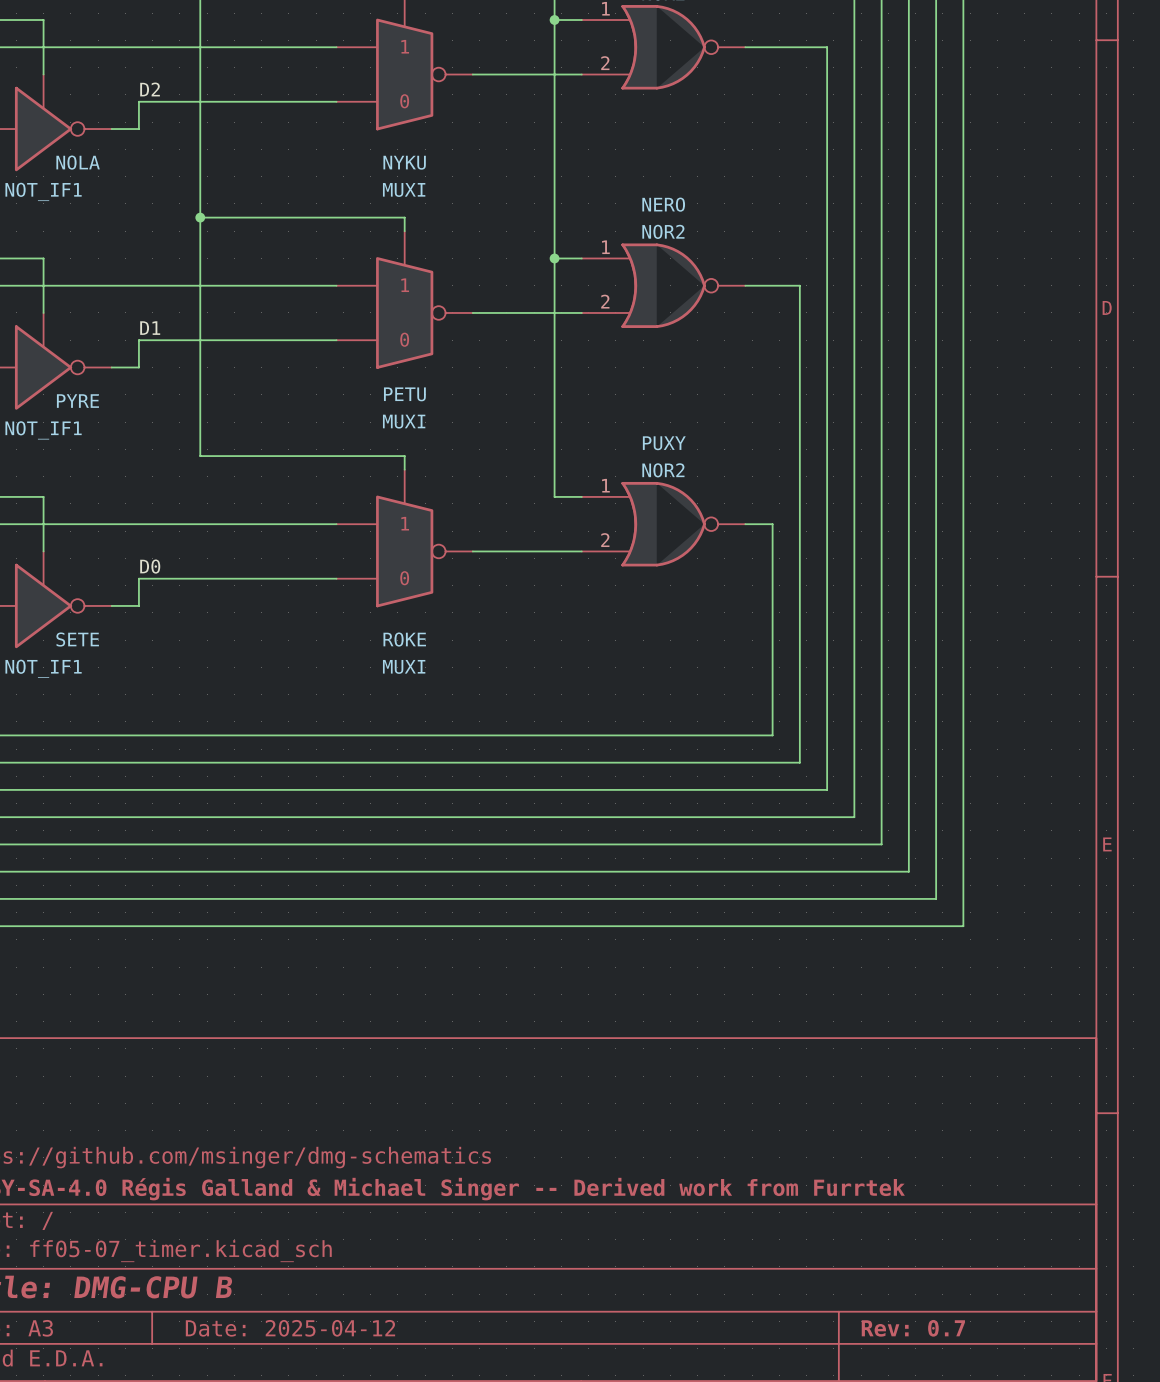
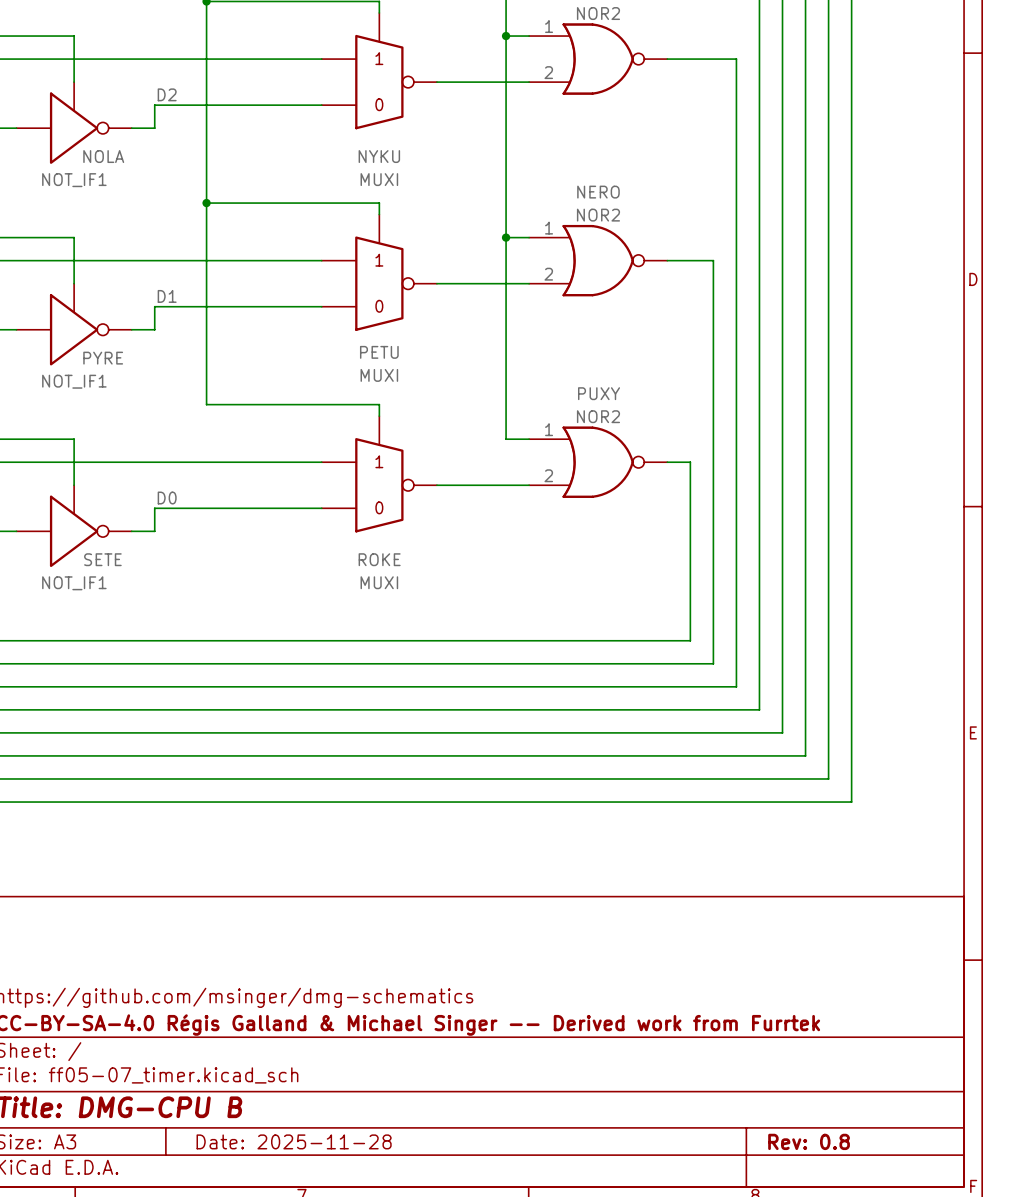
title block: Date: 2025-04-12 (290, 1328) -> Date: 2025-11-28 (294, 1141)
title block: Rev: 0.7 (913, 1328) -> Rev: 0.8 (809, 1141)

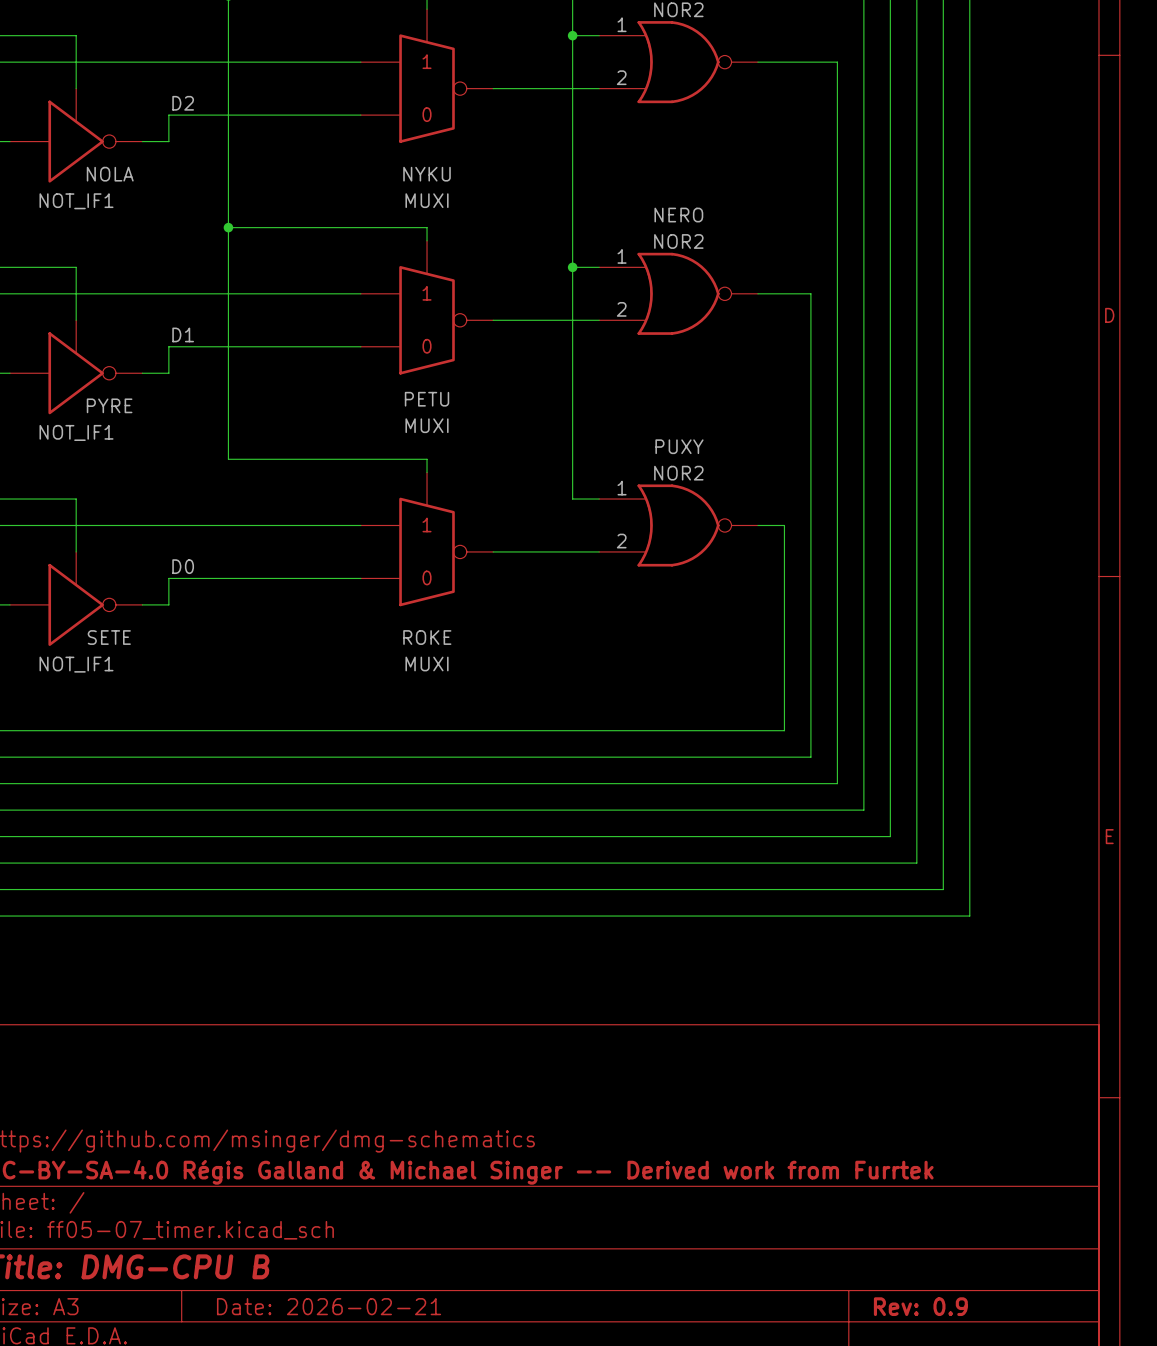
title block: Date: 2025-11-28 (294, 1141) -> Date: 2026-02-21 (329, 1306)
title block: Rev: 0.8 (809, 1141) -> Rev: 0.9 (920, 1306)

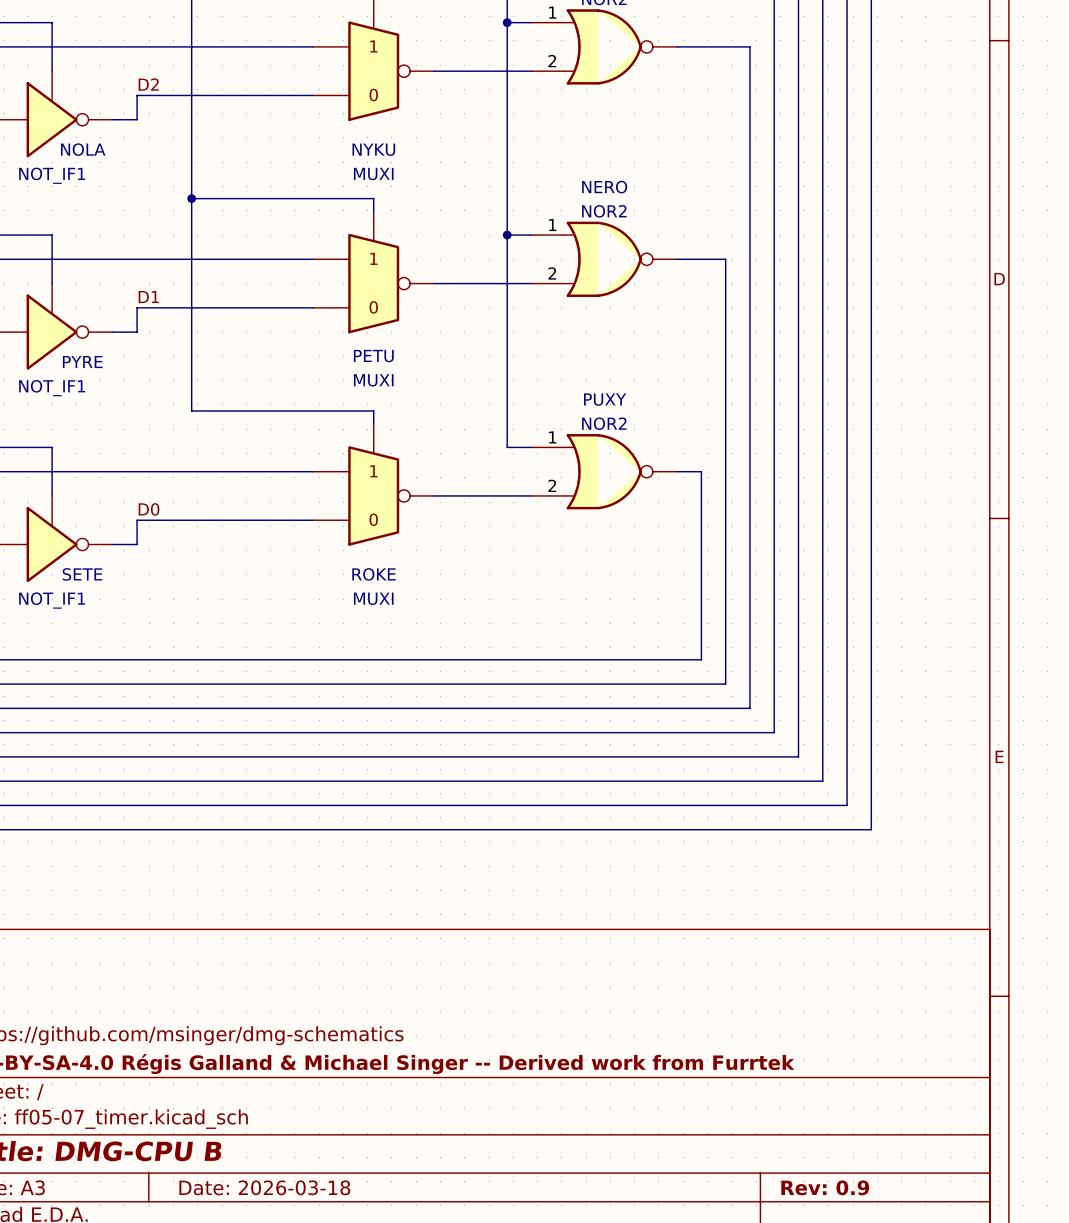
title block: Date: 2026-02-21 (329, 1306) -> Date: 2026-03-18 (264, 1187)

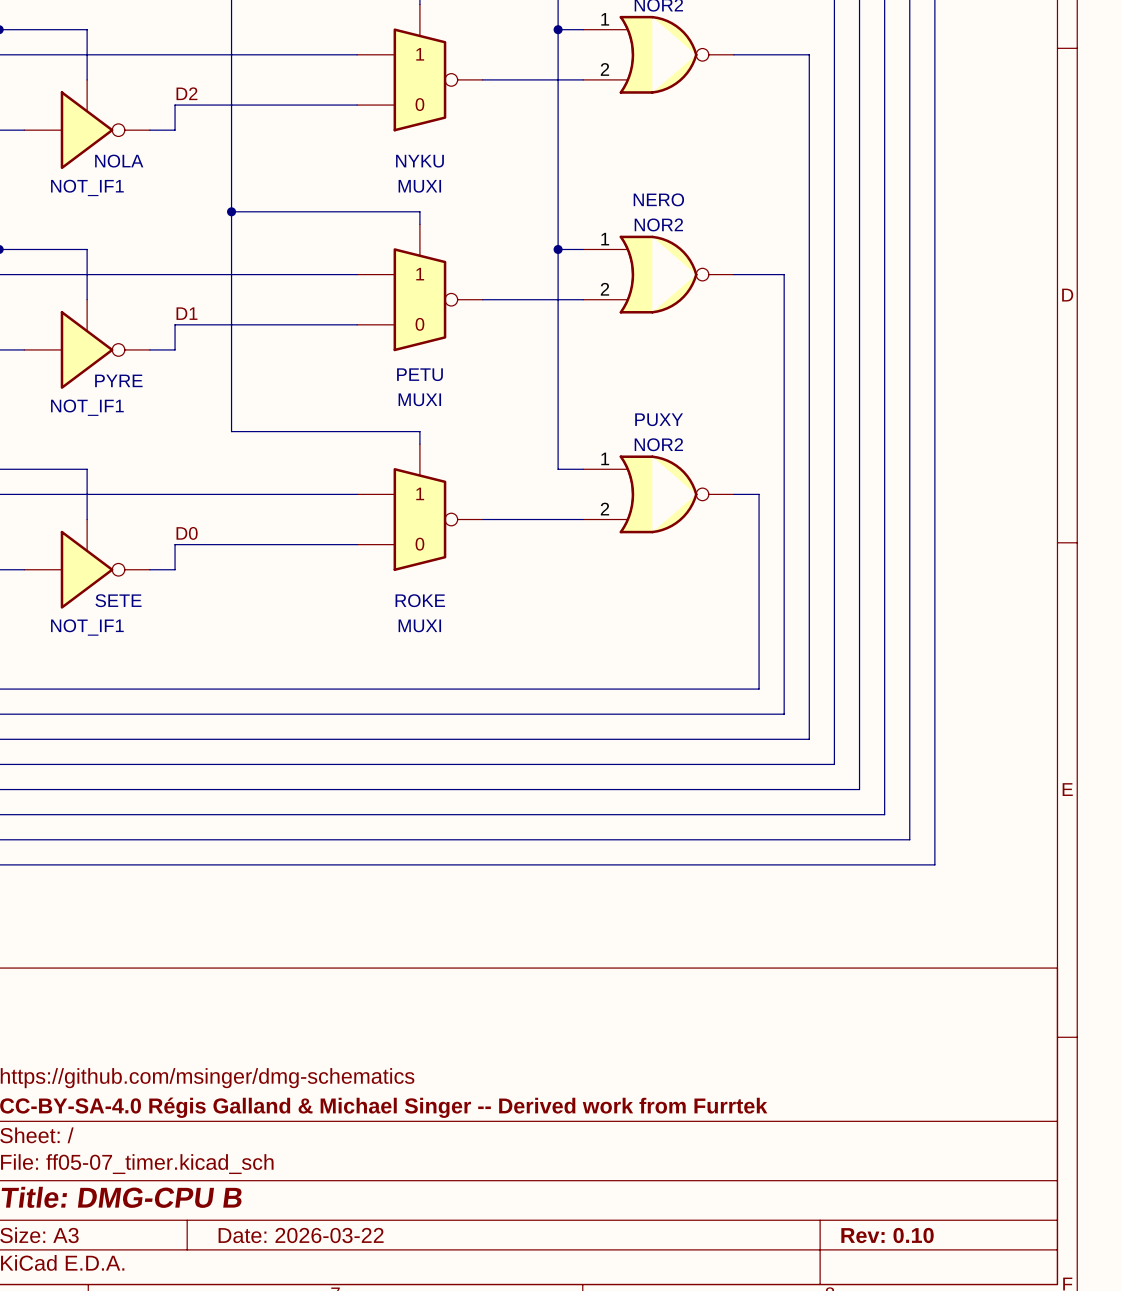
title block: Date: 2026-03-18 (264, 1187) -> Date: 2026-03-22 (301, 1235)
title block: Rev: 0.9 (825, 1187) -> Rev: 0.10 (887, 1235)

